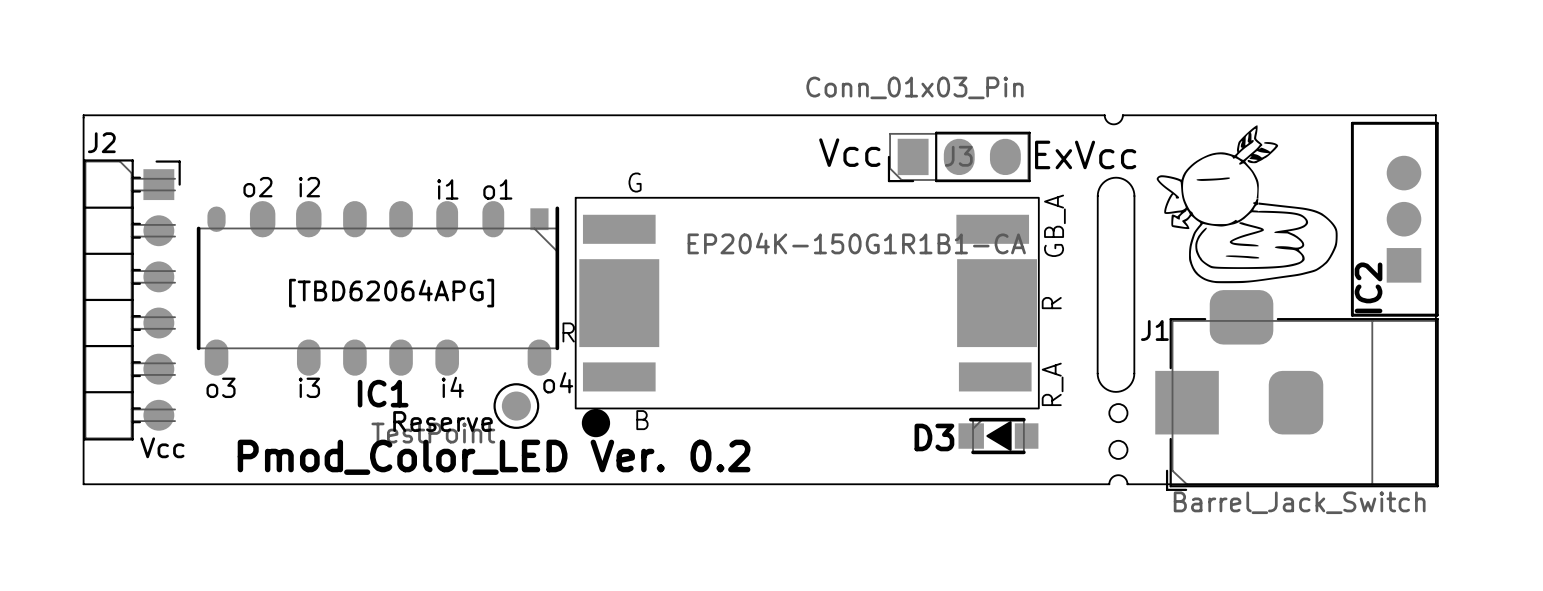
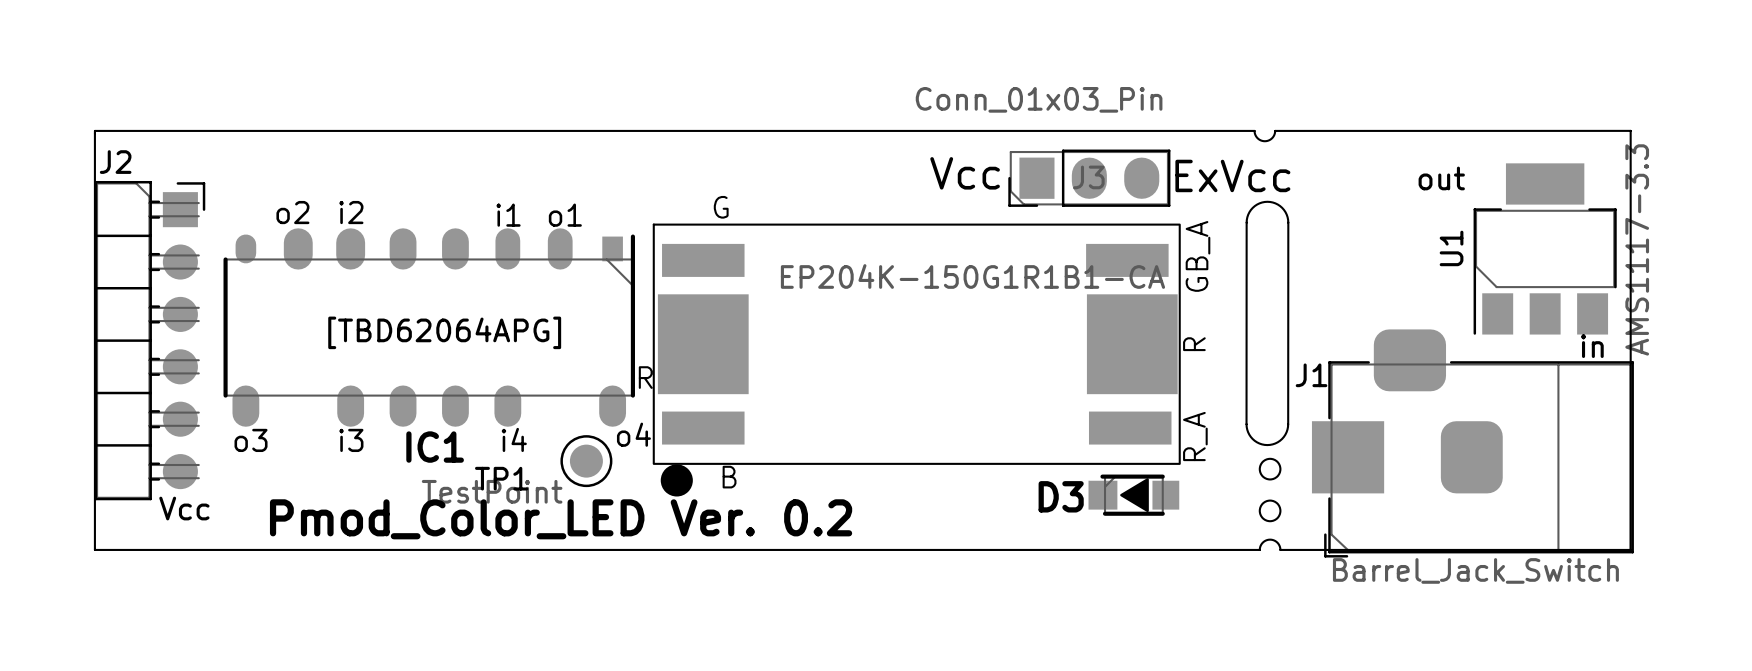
drawing: [1156, 125, 1338, 284] -> none
text: none -> out (1441, 178)
U1: none -> AMS1117-3.3 (1545, 249)
IC2: (1394, 219) -> none
text: none -> in (1592, 346)
Reserve name: Reserve (443, 421) -> TP1 (501, 478)

